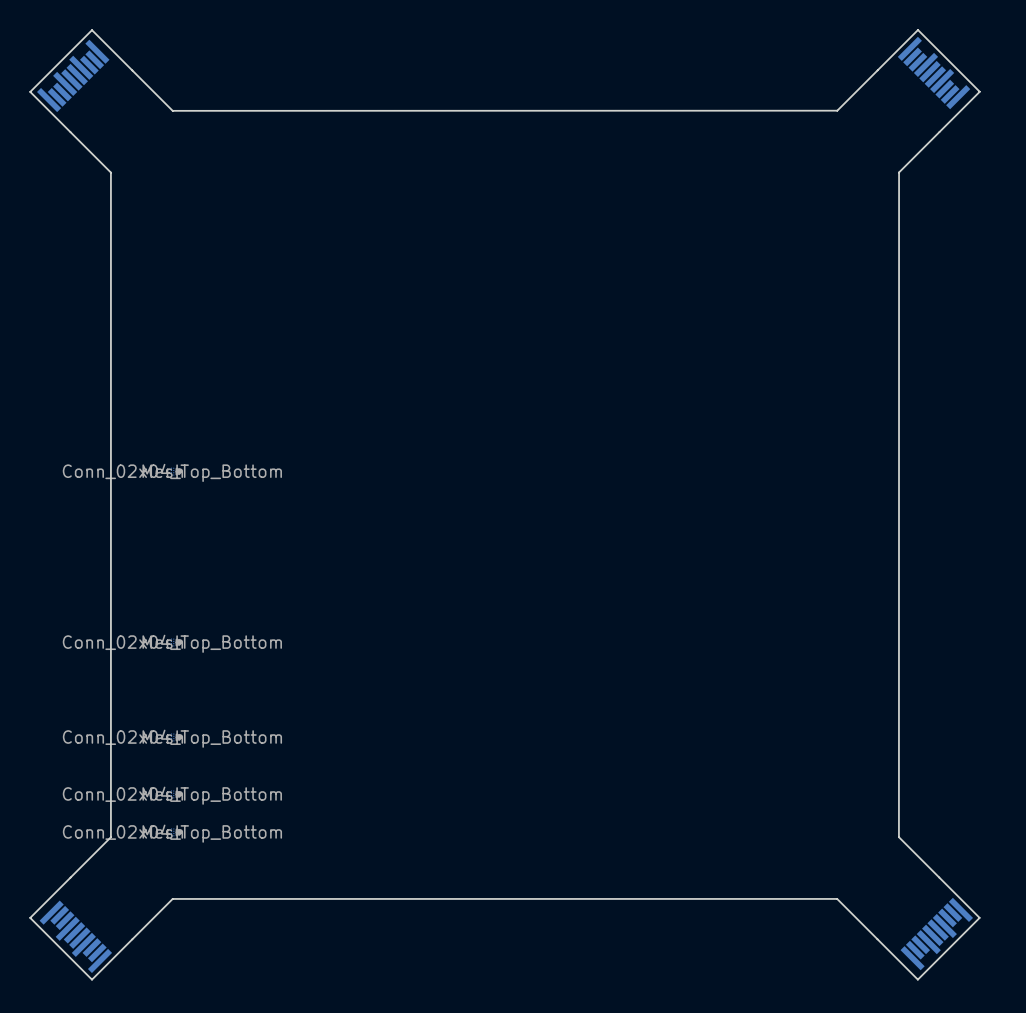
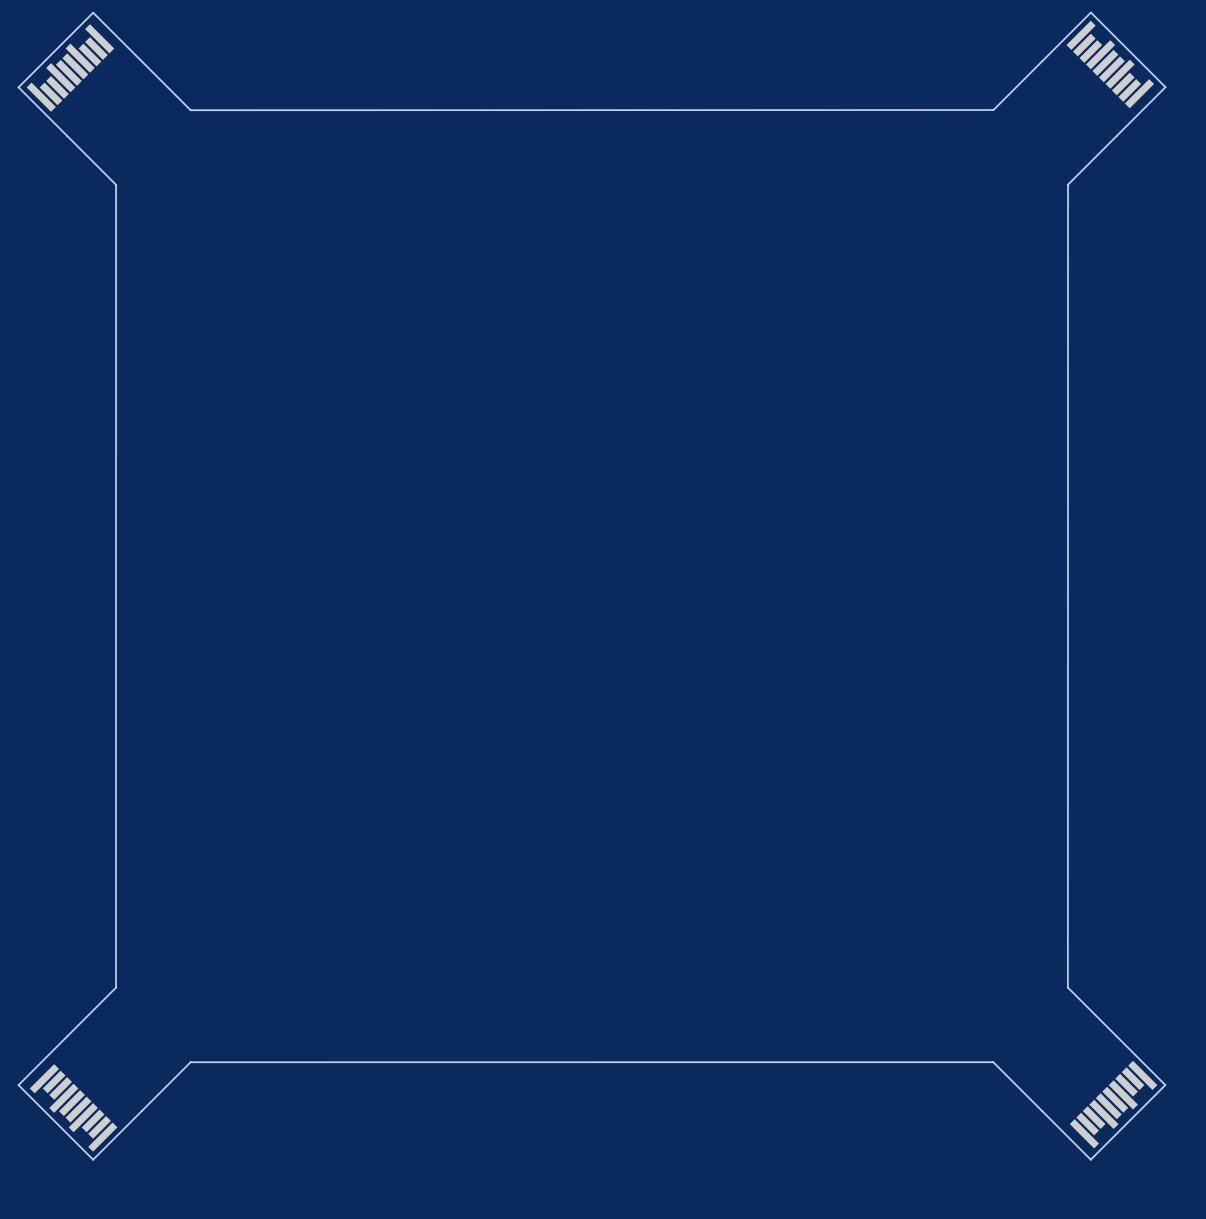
part: Conn_02x04_Top_Bottom (176, 471) -> none
part: Conn_02x04_Top_Bottom (176, 642) -> none
part: Conn_02x04_Top_Bottom (176, 737) -> none
part: Conn_02x04_Top_Bottom (176, 794) -> none
part: Conn_02x04_Top_Bottom (176, 832) -> none

